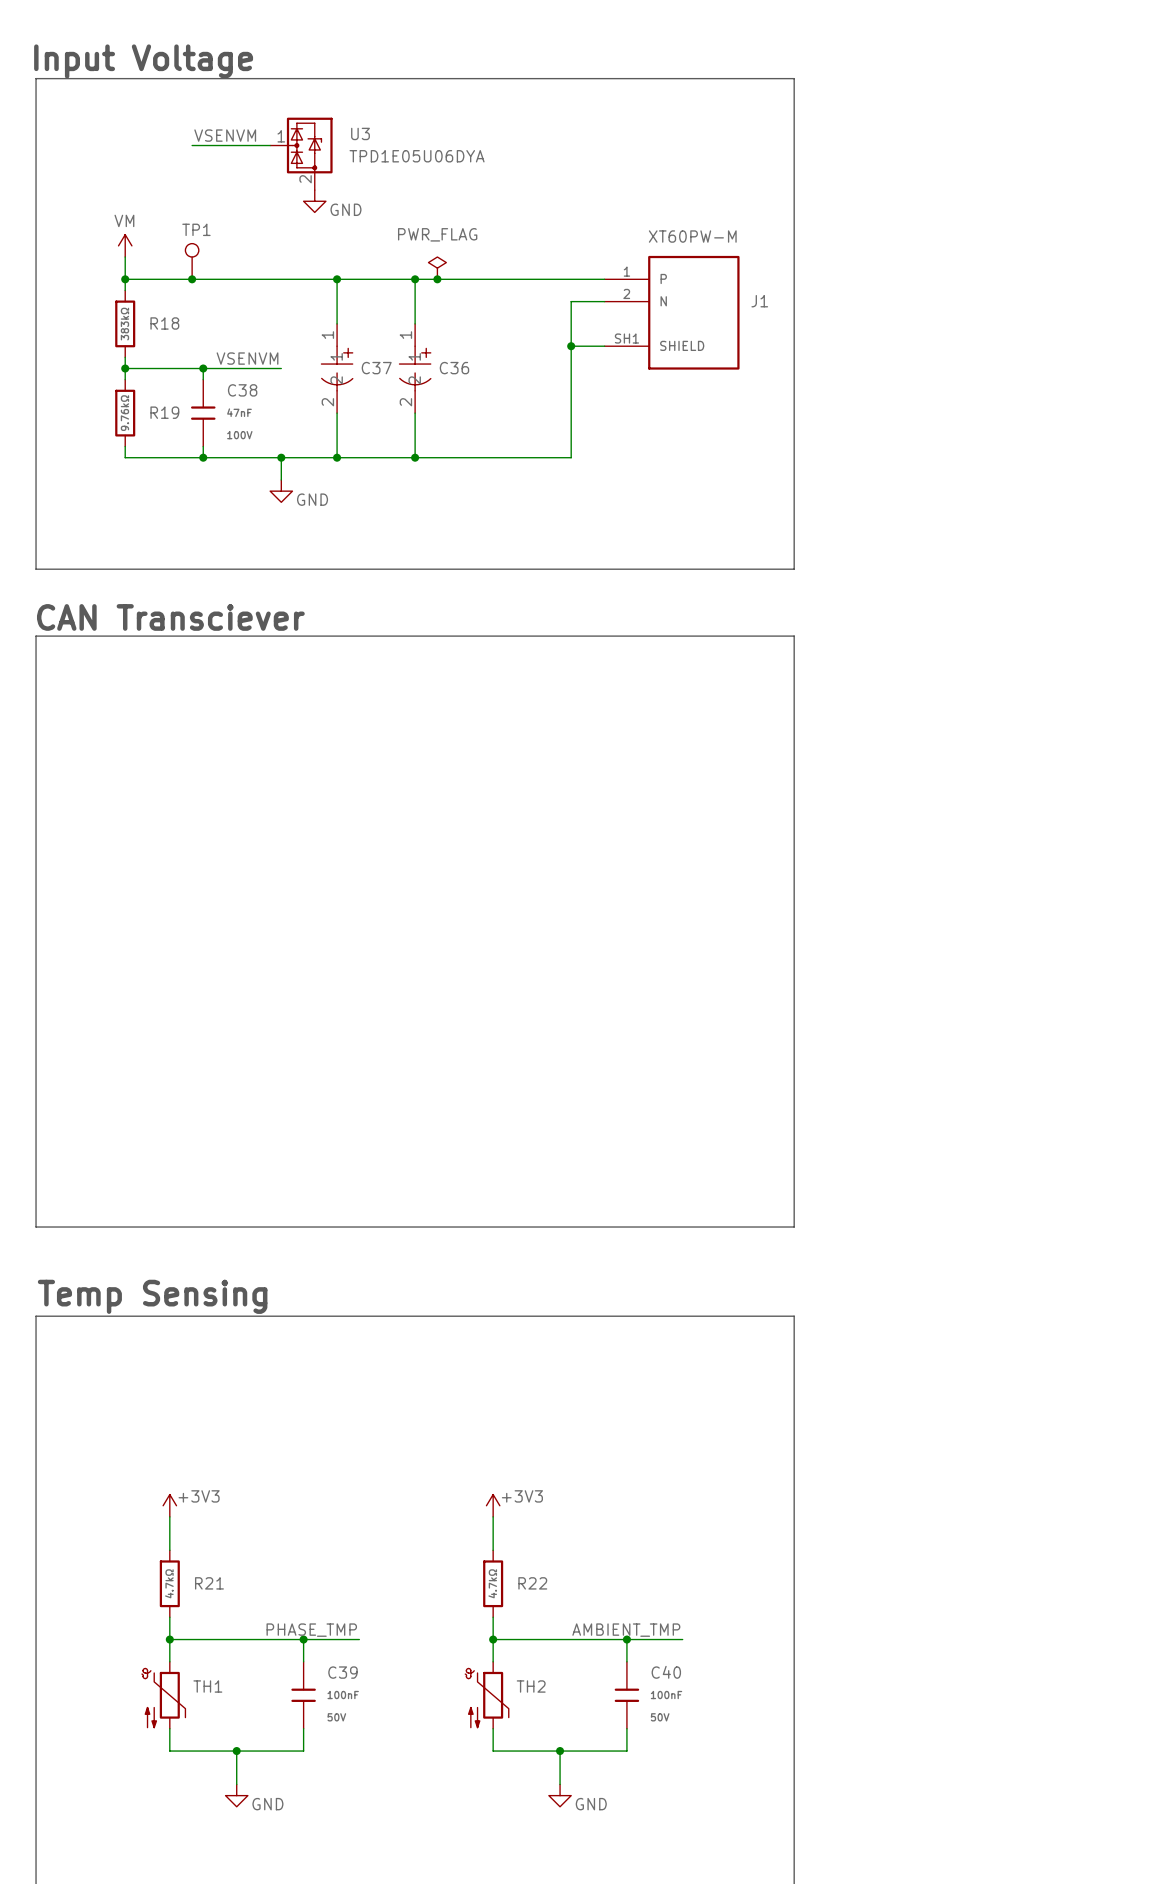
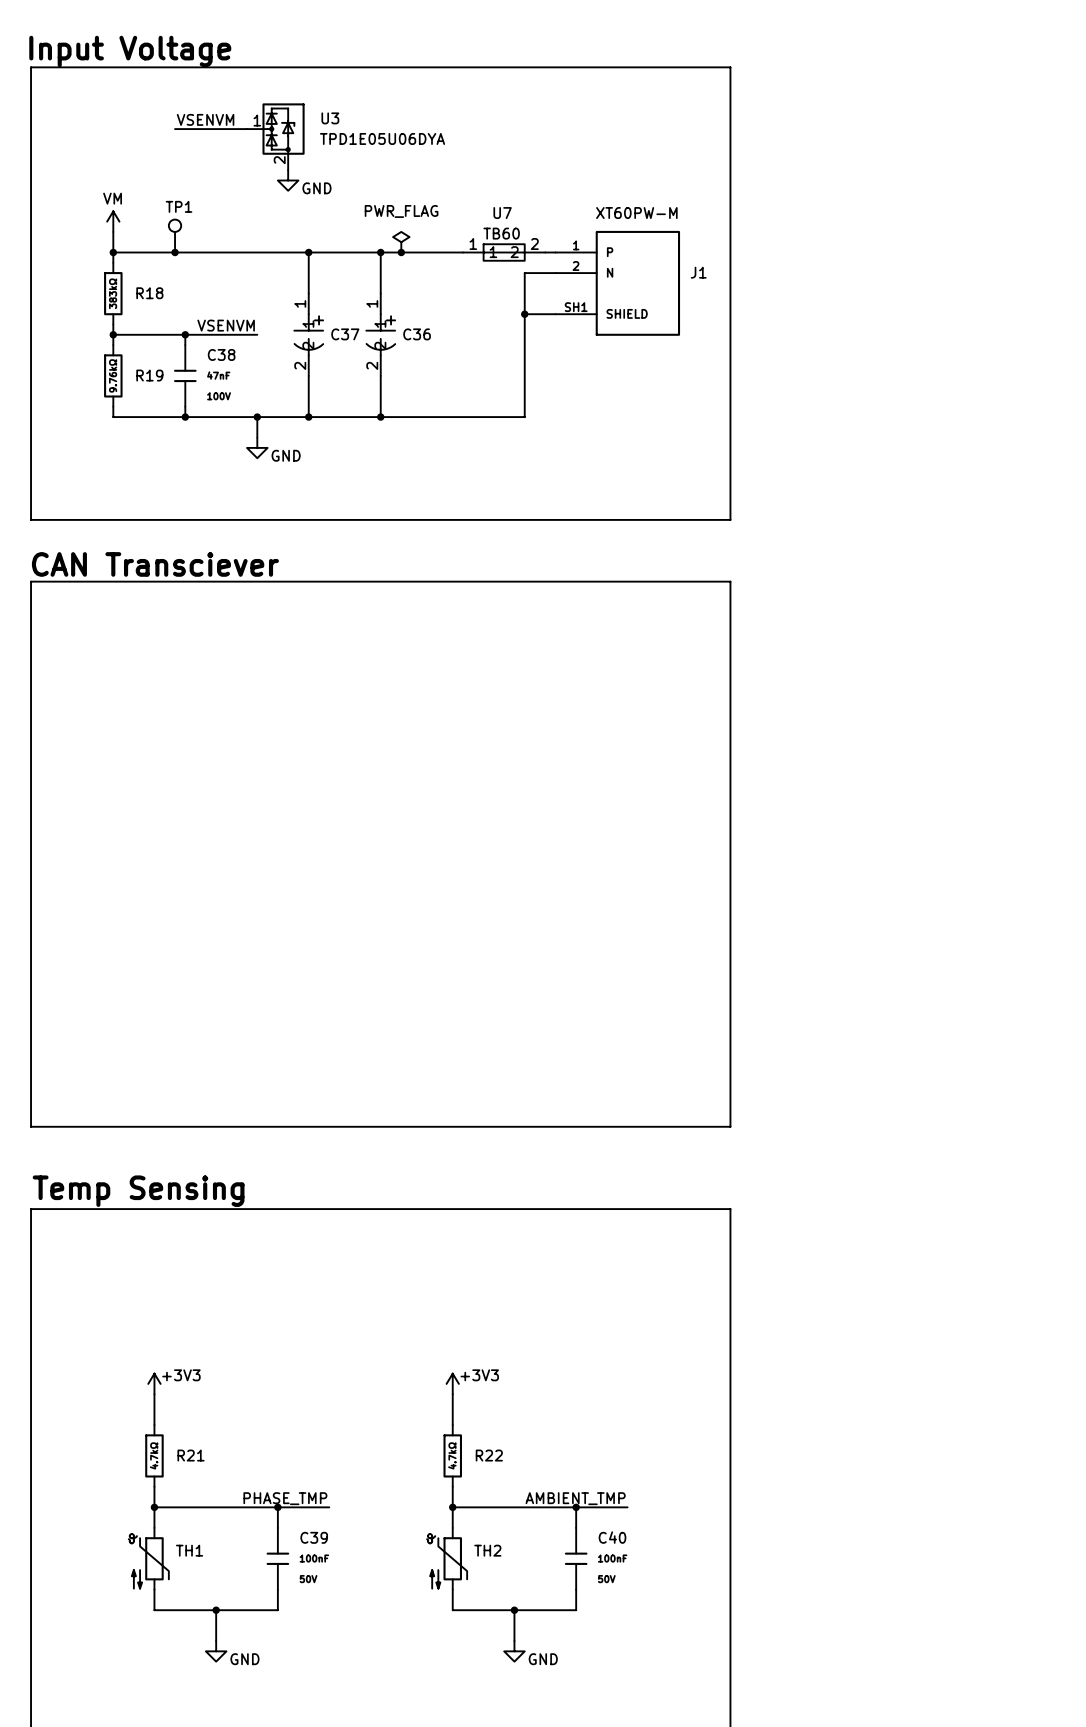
U7: none -> TB60 (504, 252)

